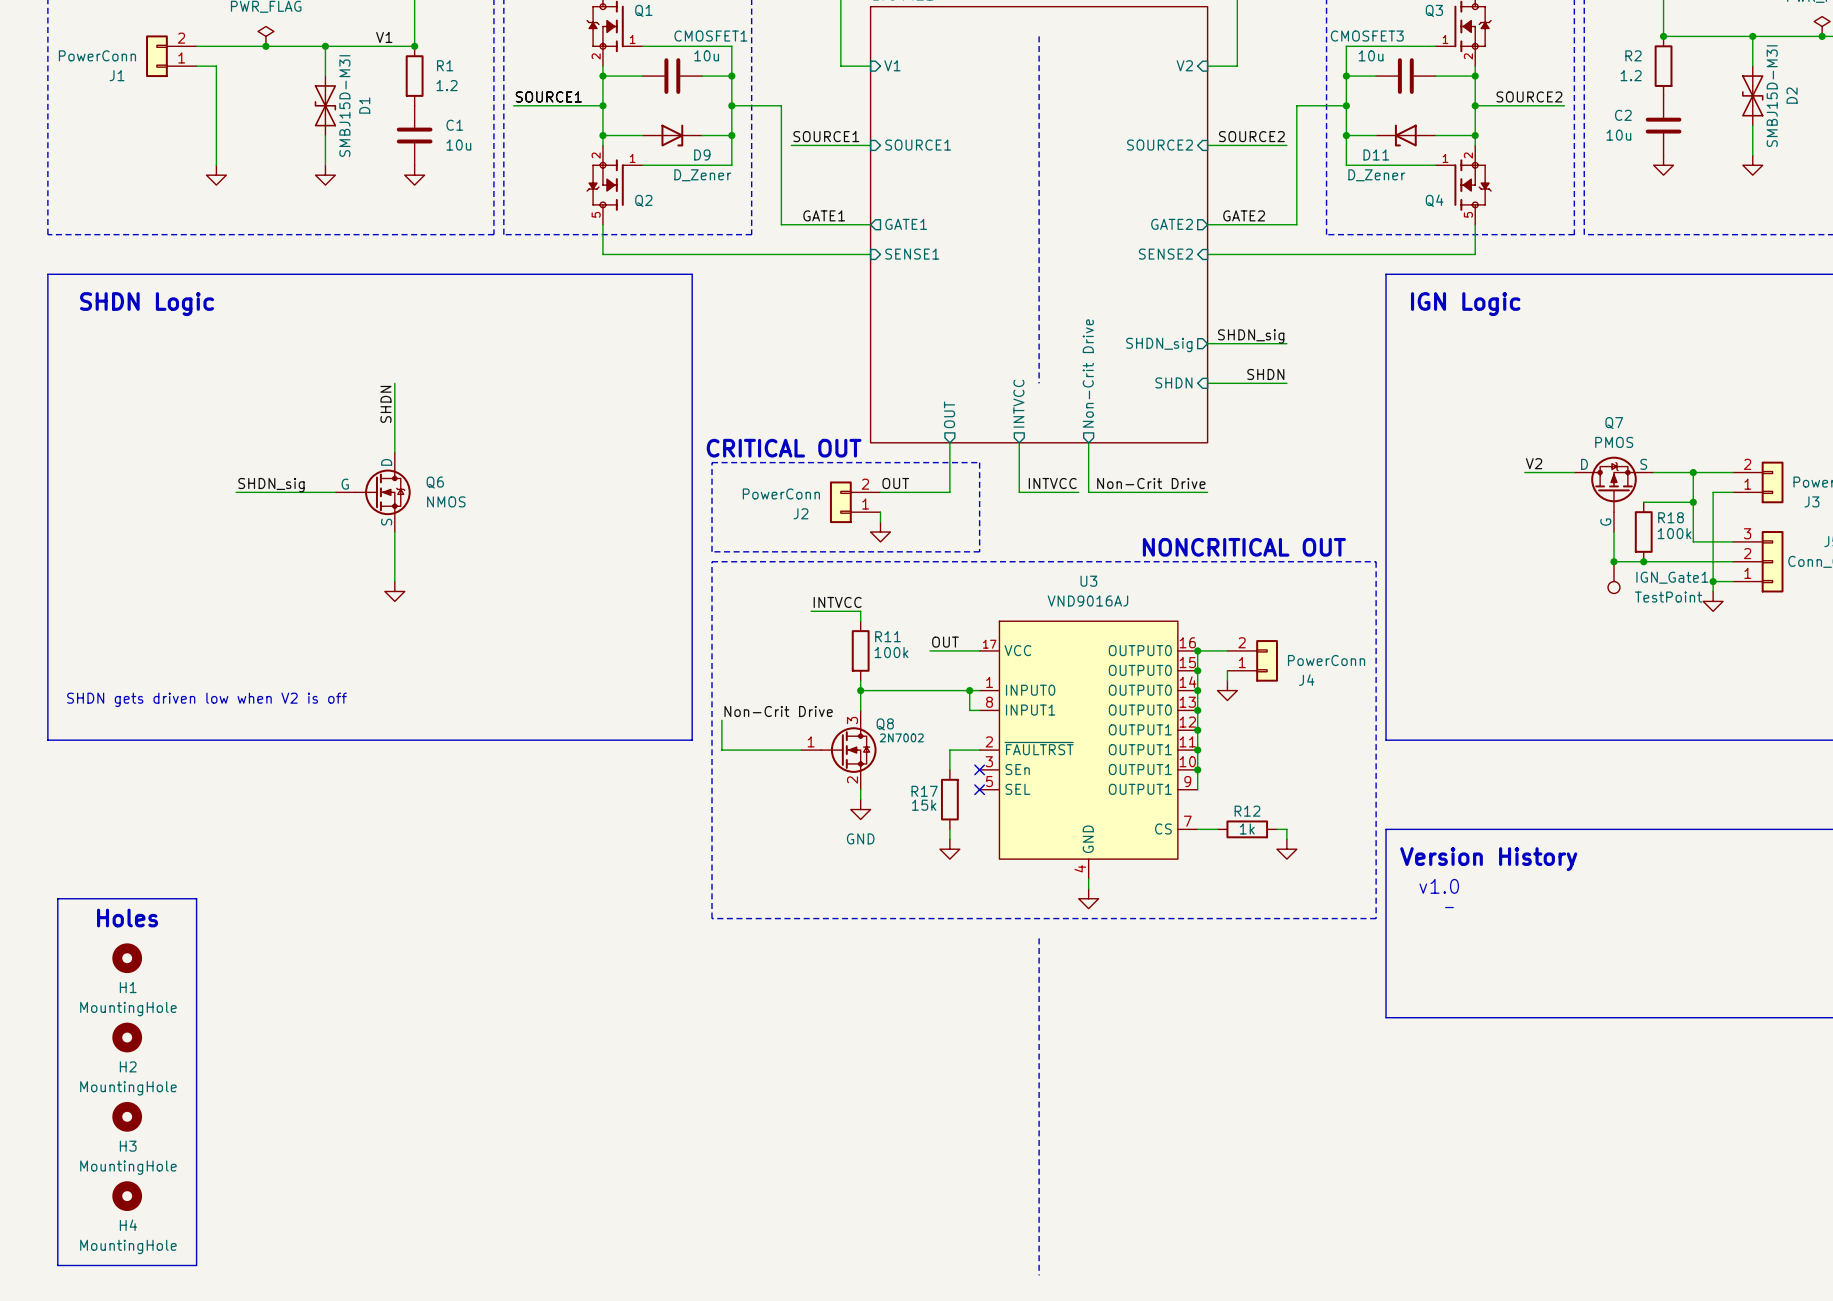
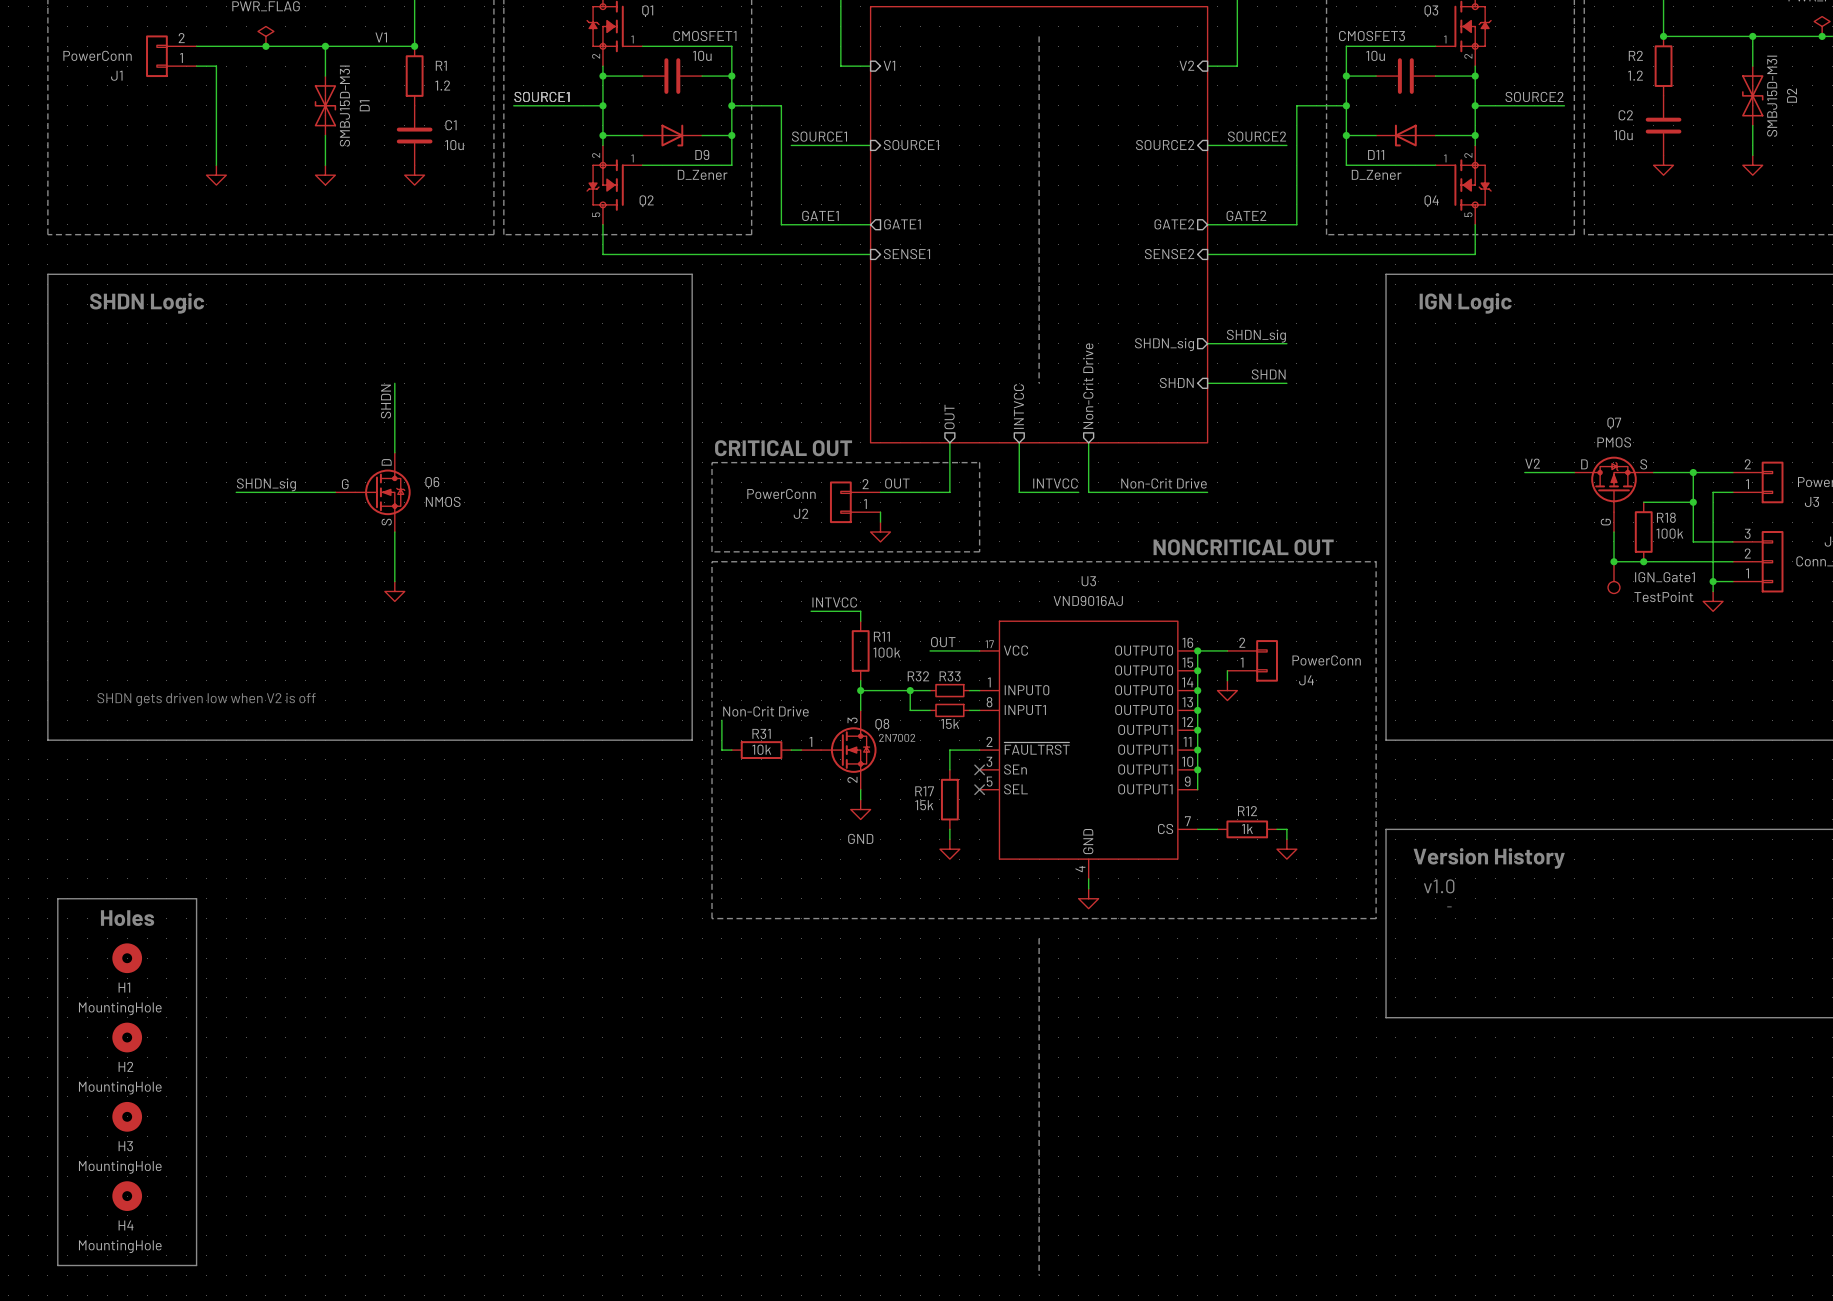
wire: none -> (910, 690) (910, 710) (930, 710)
junction: none -> (910, 690)
wire: (930, 690) (969, 690) (969, 710) -> none
R32: none -> (949, 690)
junction: (969, 690) -> none
R33: none -> 15k (949, 710)
wire: (731, 750) (791, 750) -> none
R31: none -> 10k (761, 750)

